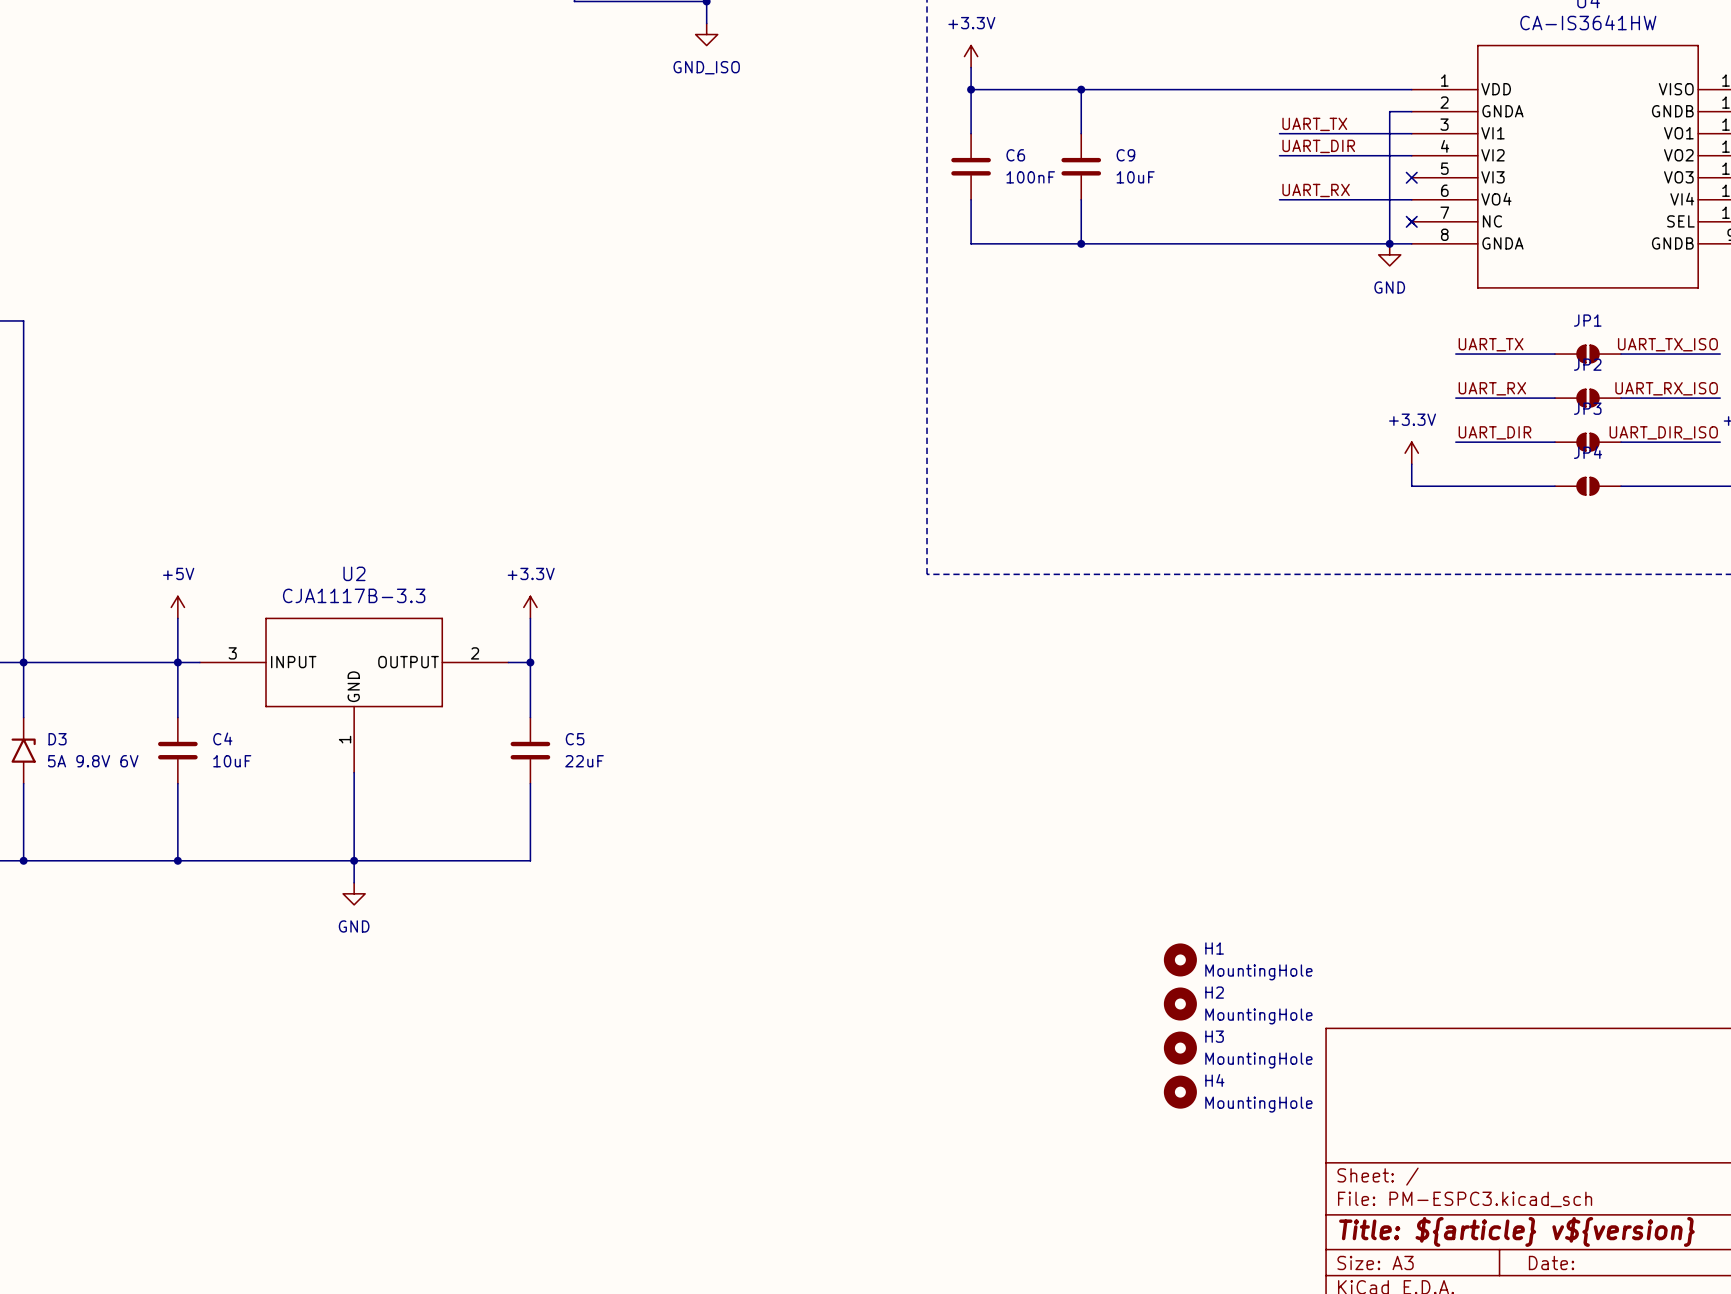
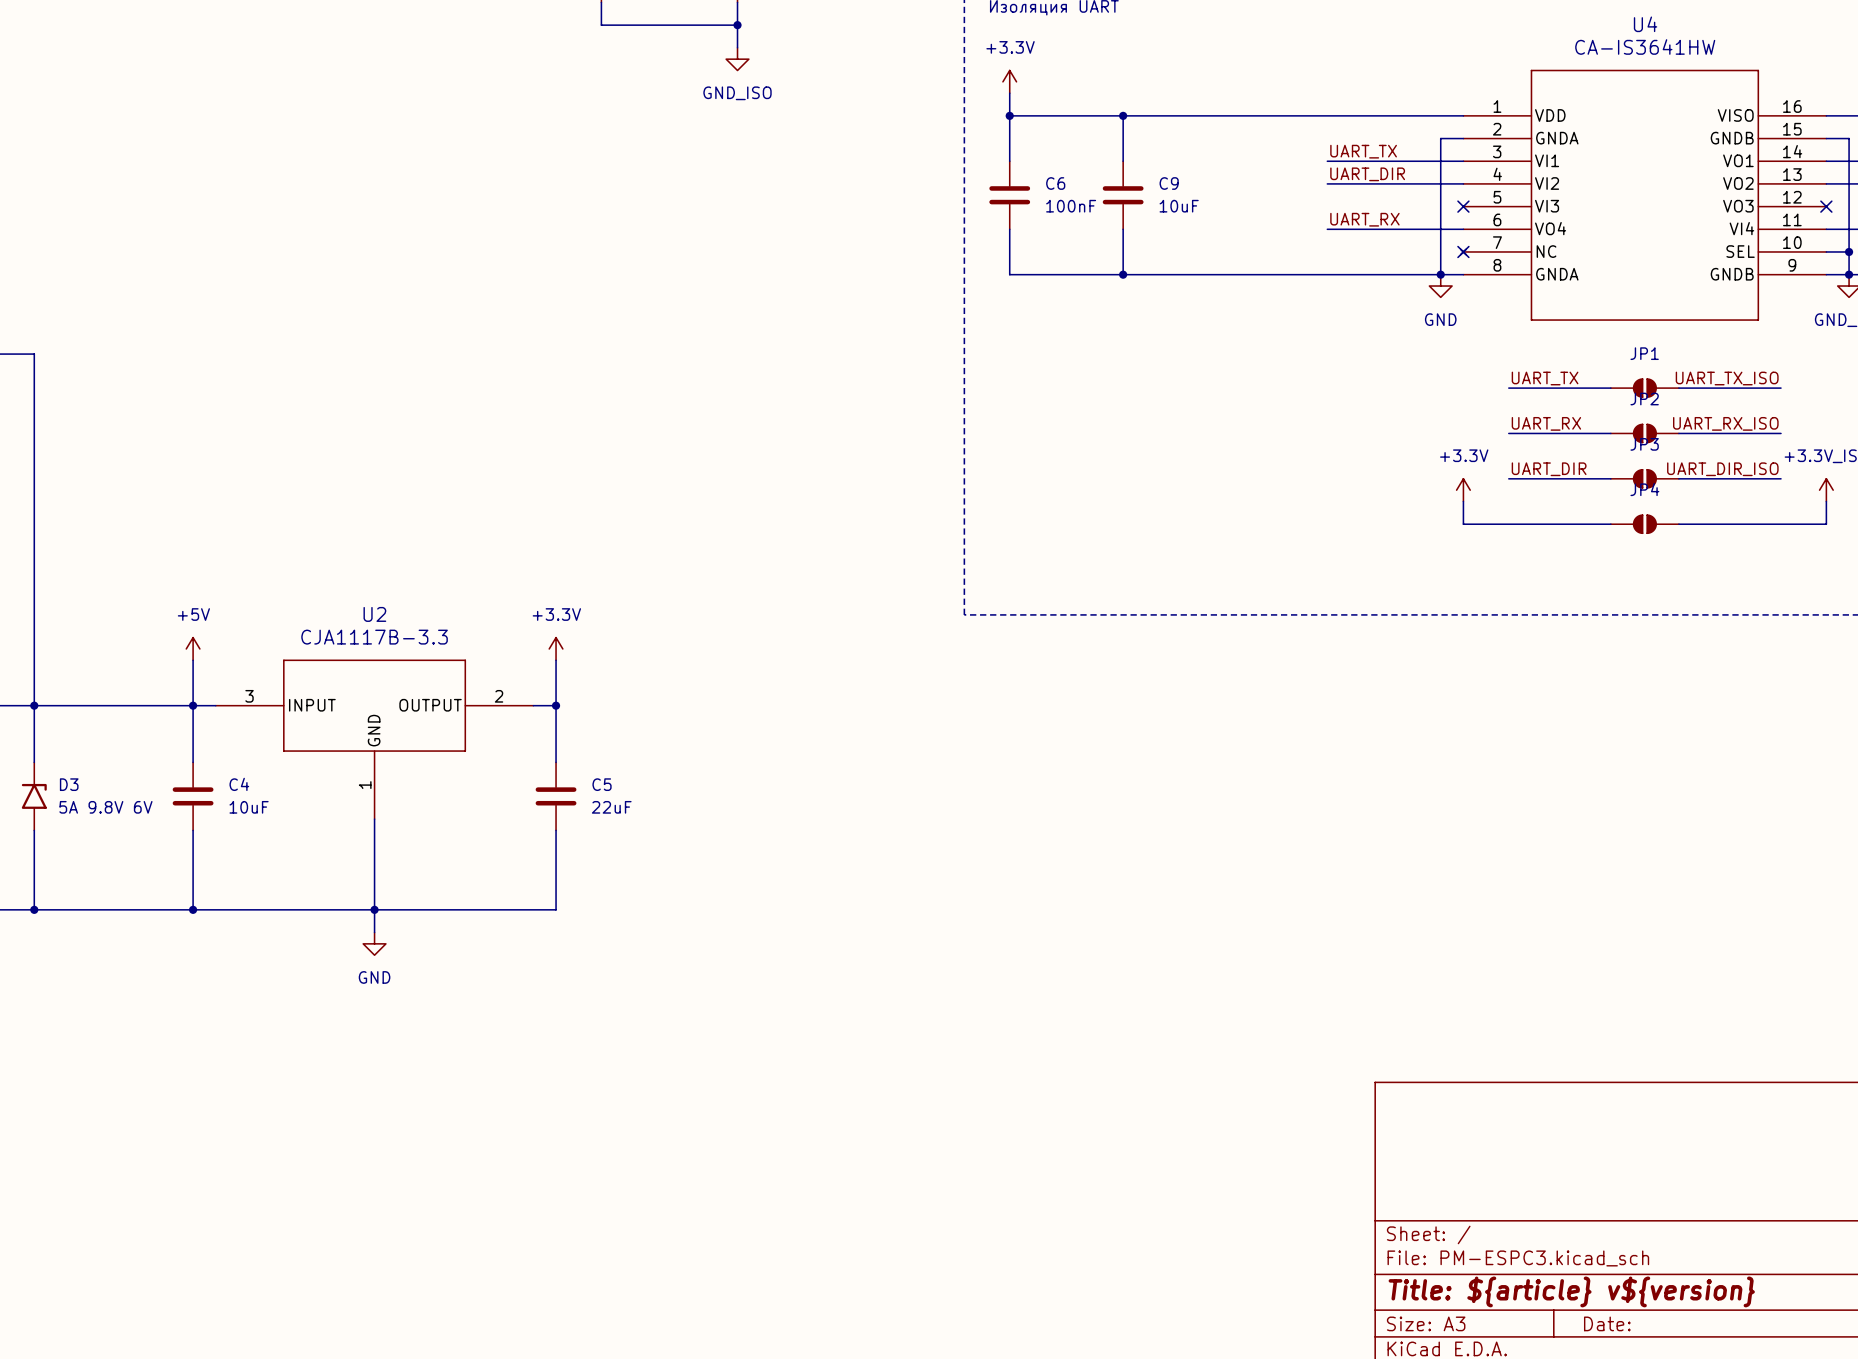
H1: MountingHole (1180, 959) -> none
H2: MountingHole (1180, 1004) -> none
H3: MountingHole (1180, 1048) -> none
H4: MountingHole (1180, 1092) -> none

